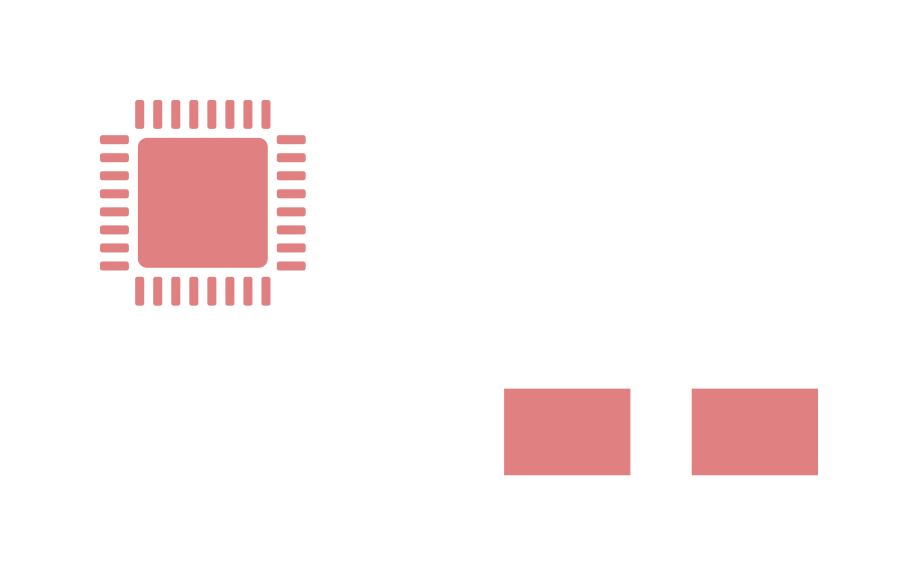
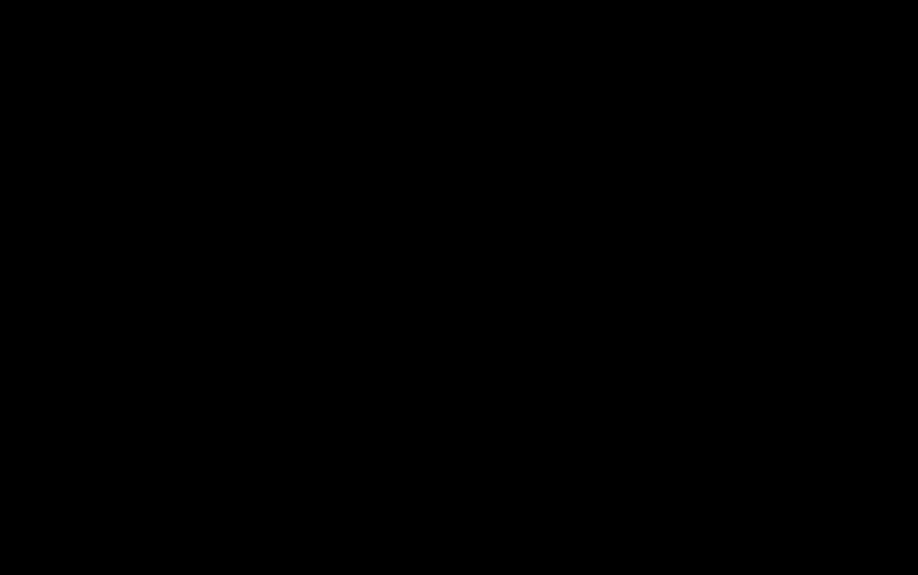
part: (202, 202) -> none
part: (661, 431) -> none

